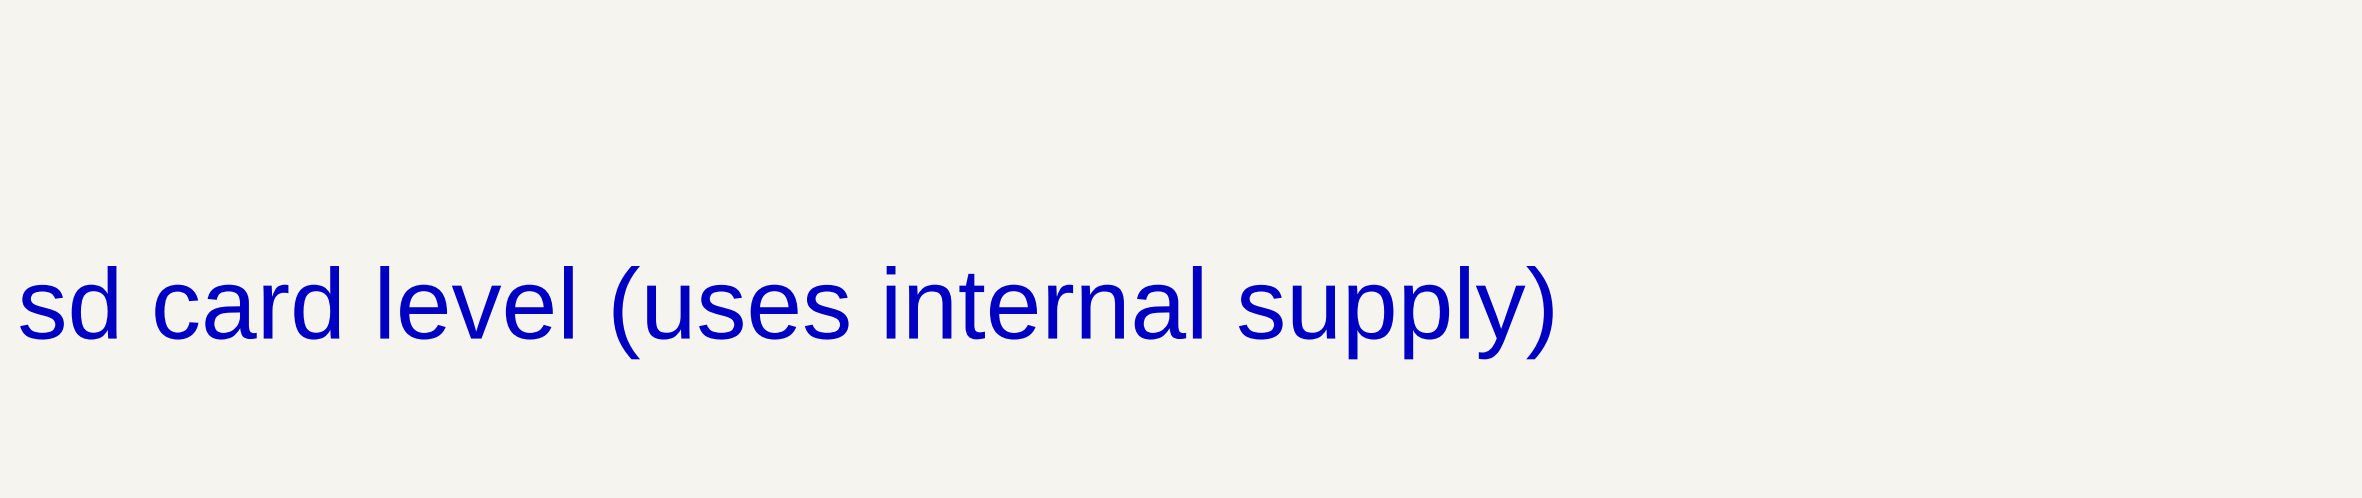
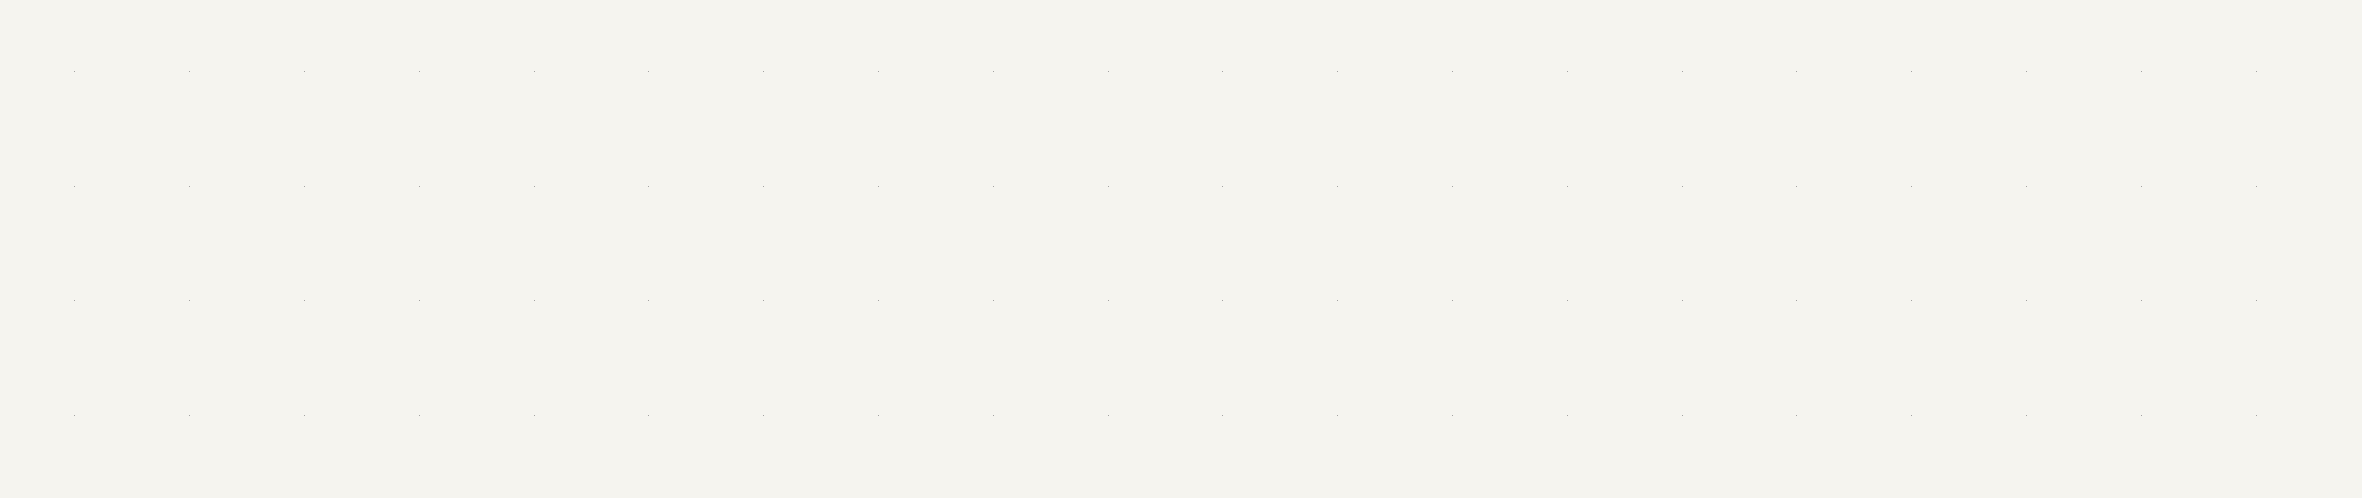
text: sd card level (uses internal supply) (786, 312) -> none

